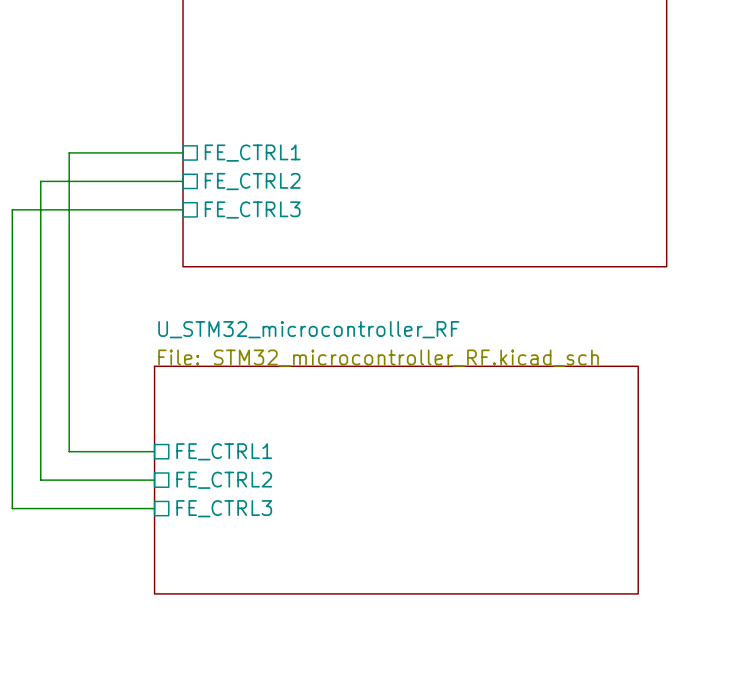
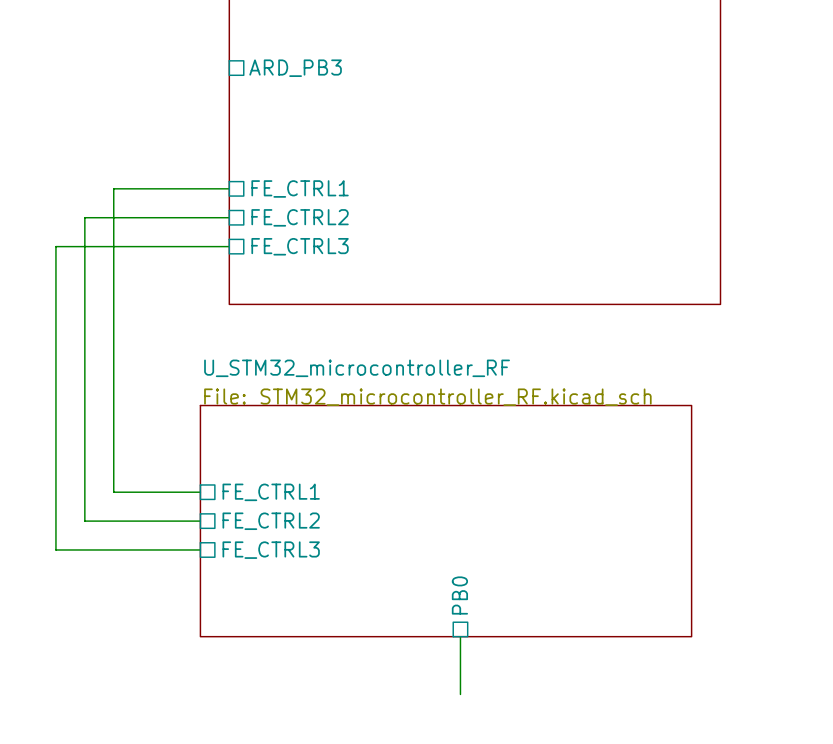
sheet pin: none -> ARD_PB3 (295, 68)
sheet pin: none -> PB0 (459, 595)
wire: none -> (460, 636) (460, 694)

